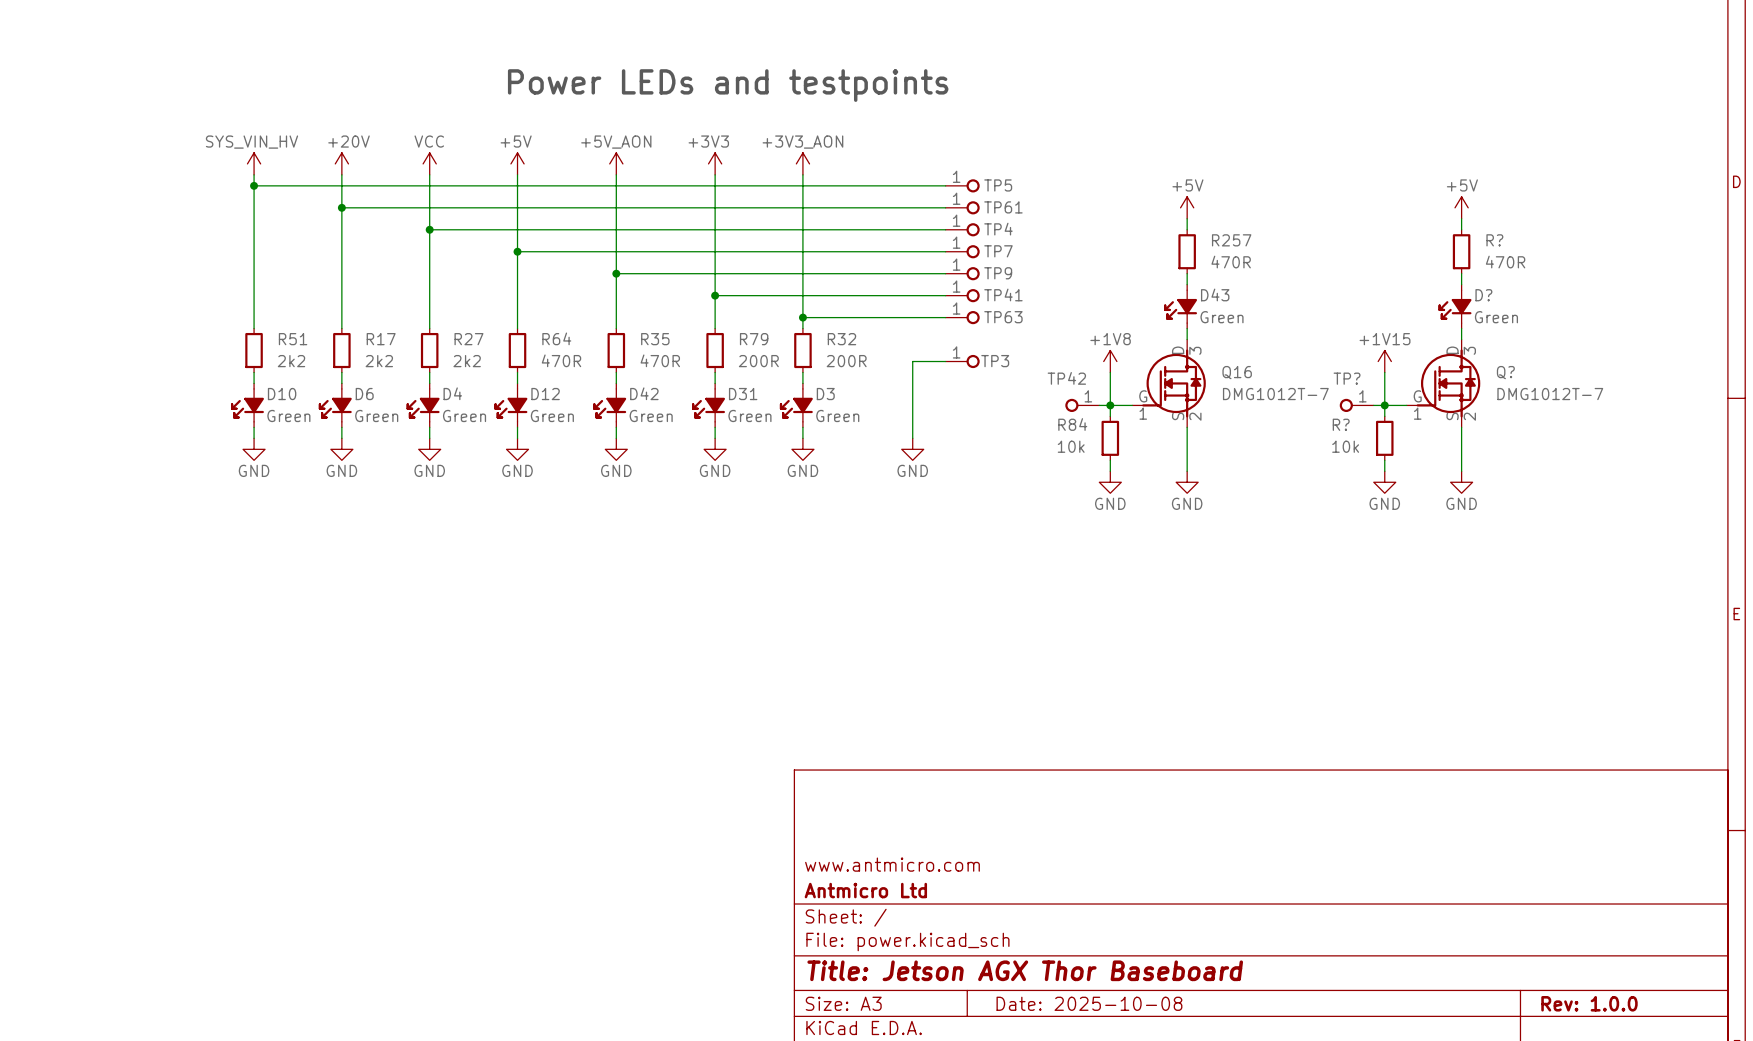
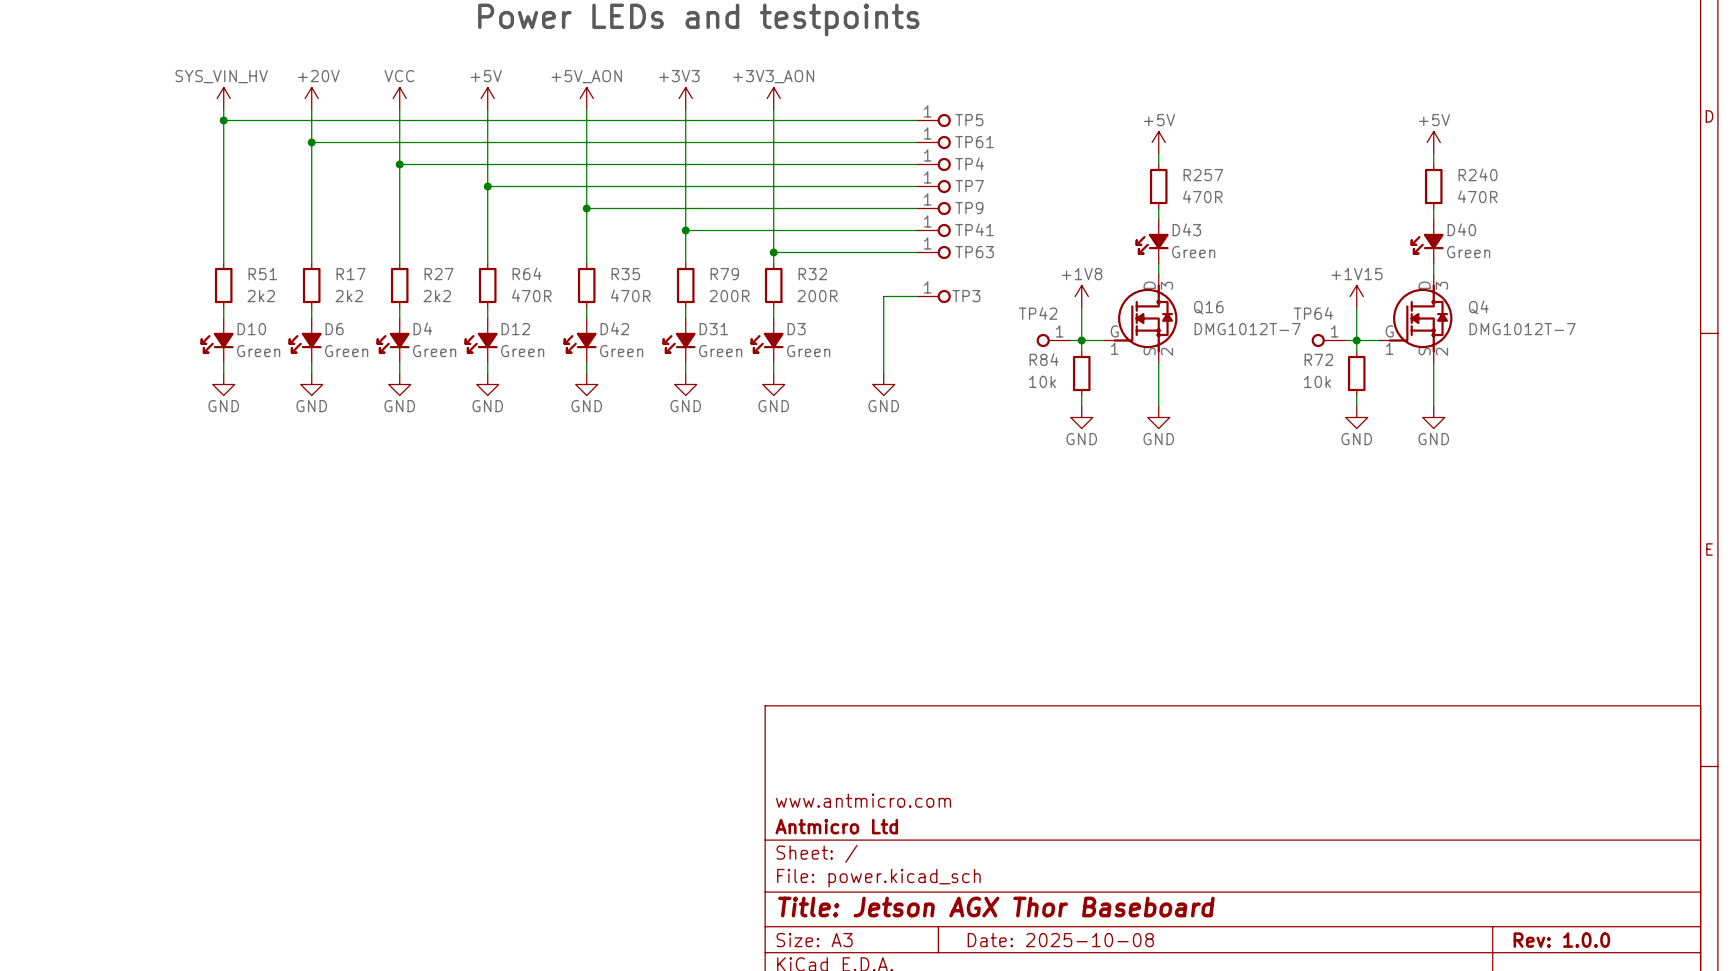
R? name: R? (1494, 240) -> R240 (1478, 174)
D? name: D? (1483, 295) -> D40 (1461, 229)
Q? name: Q? (1505, 372) -> Q4 (1478, 307)
TP? name: TP? (1347, 378) -> TP64 (1313, 313)
R? name: R? (1341, 424) -> R72 (1318, 359)

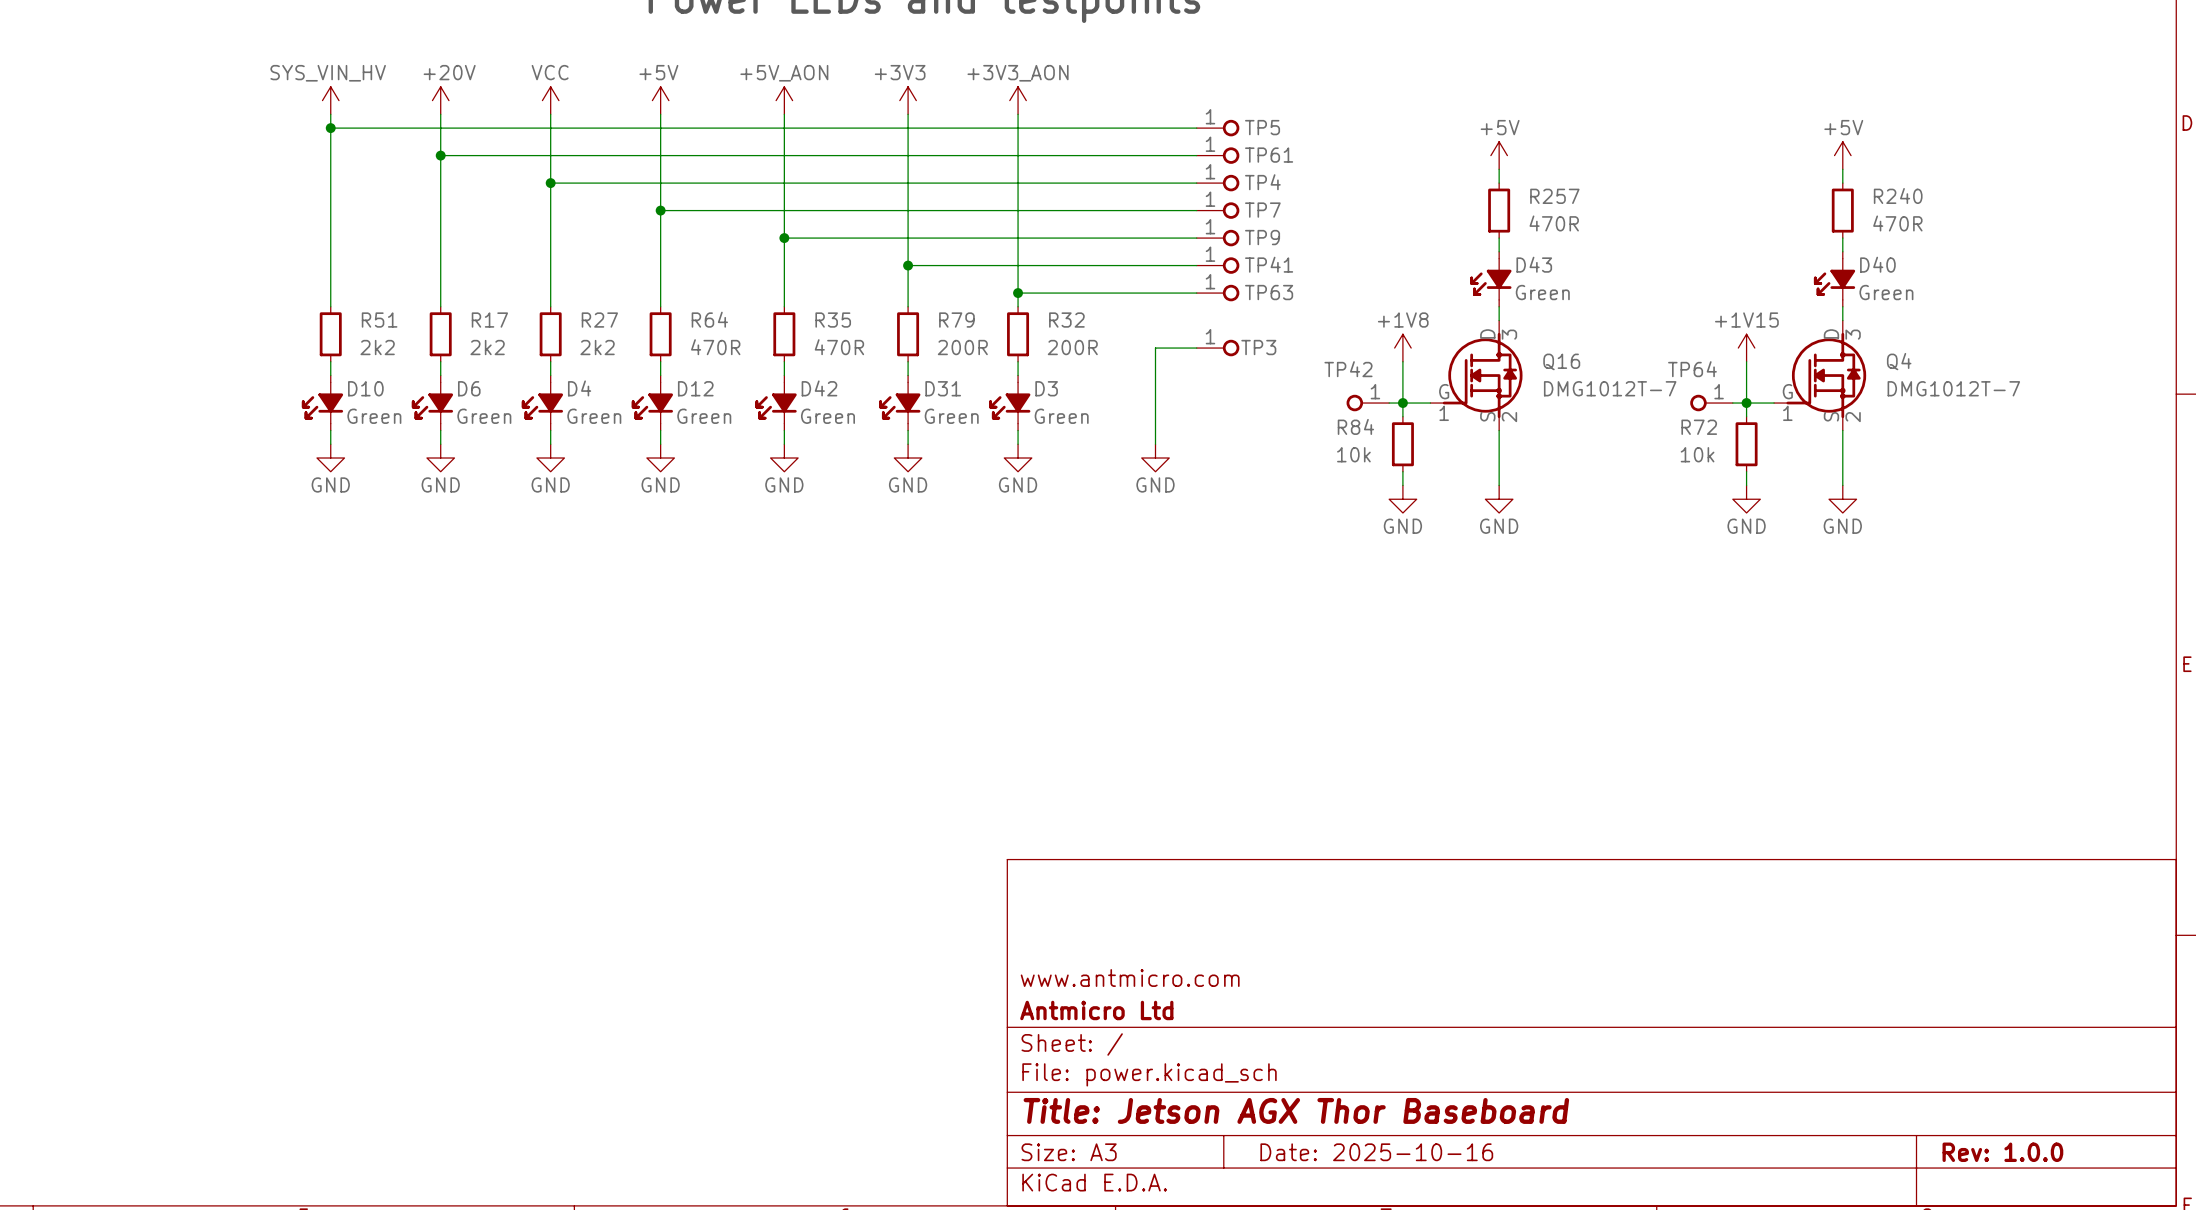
title block: Date: 2025-10-08 (1060, 940) -> Date: 2025-10-16 (1376, 1152)

